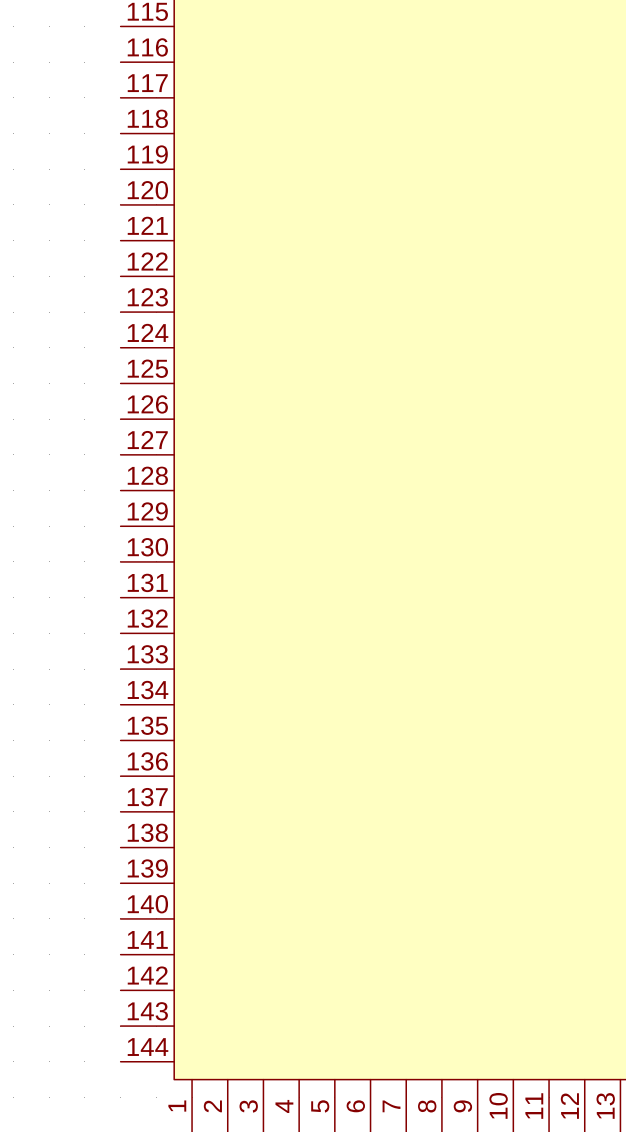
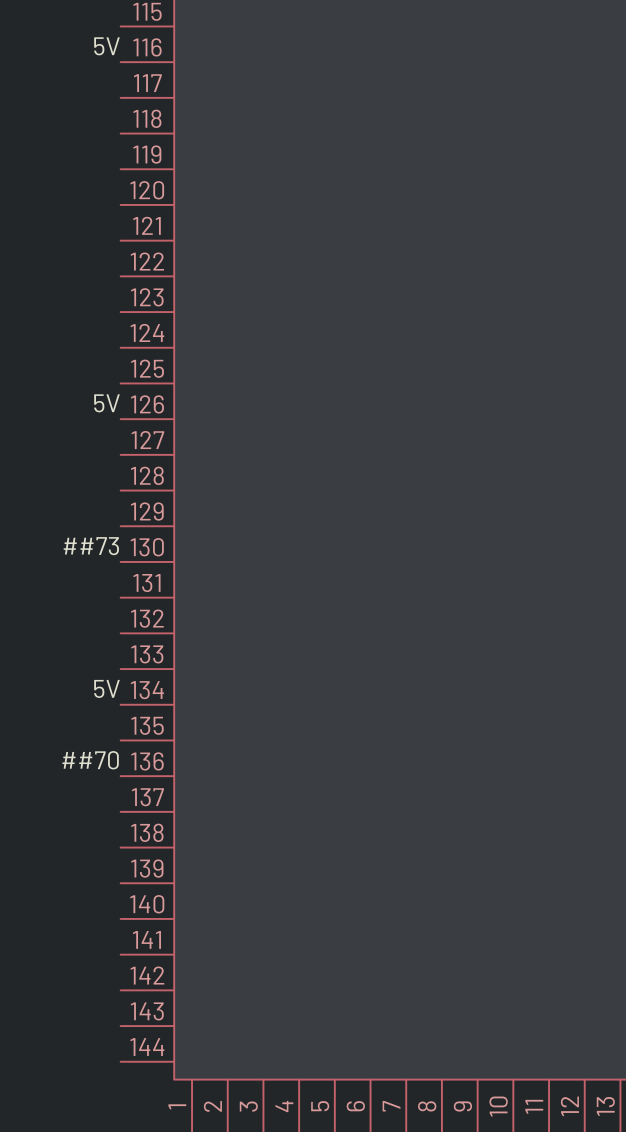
label: none -> 5V (106, 46)
label: none -> 5V (106, 403)
label: none -> ##73 (91, 546)
label: none -> 5V (106, 688)
label: none -> ##70 (90, 760)

